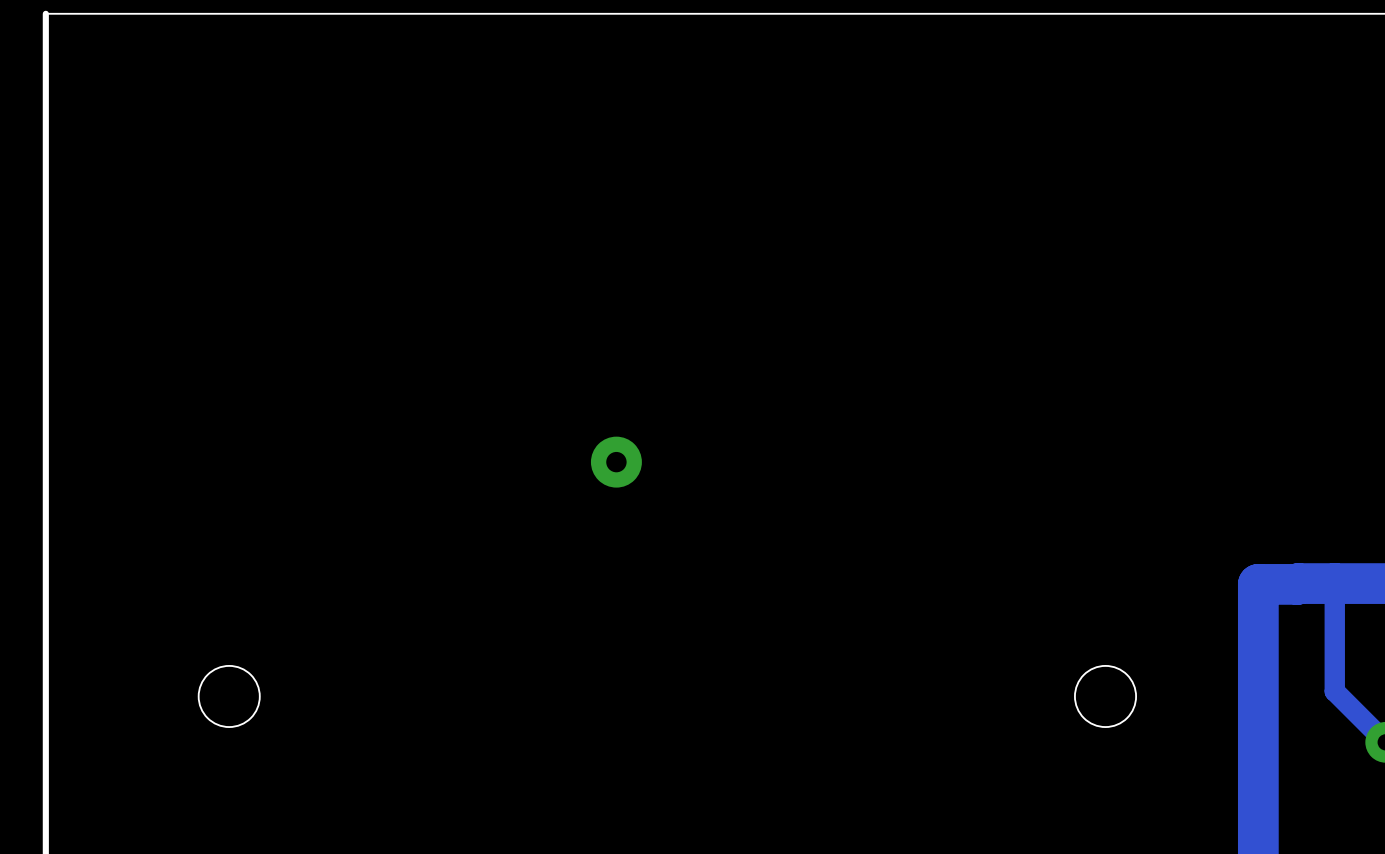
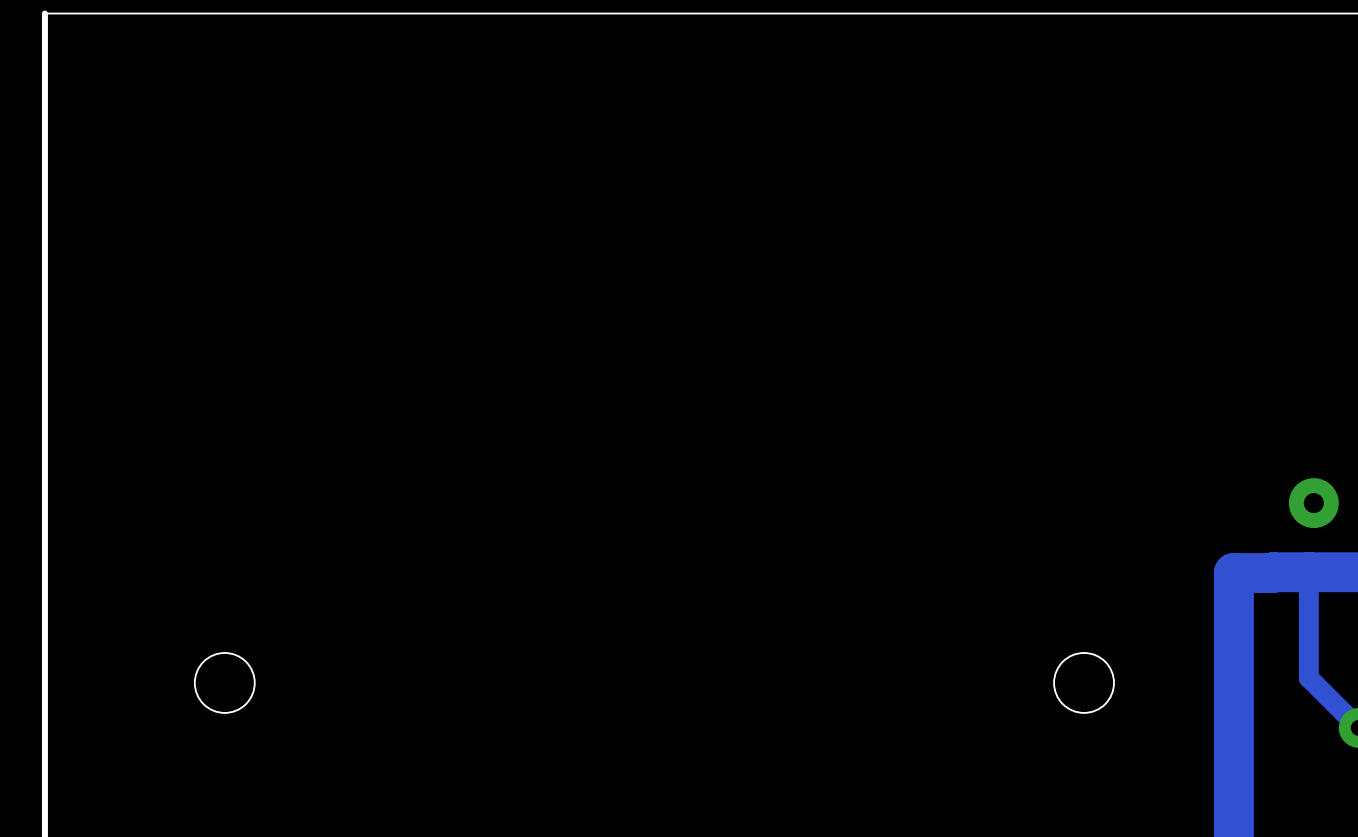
via: (616, 462) -> none
via: none -> (1313, 503)

